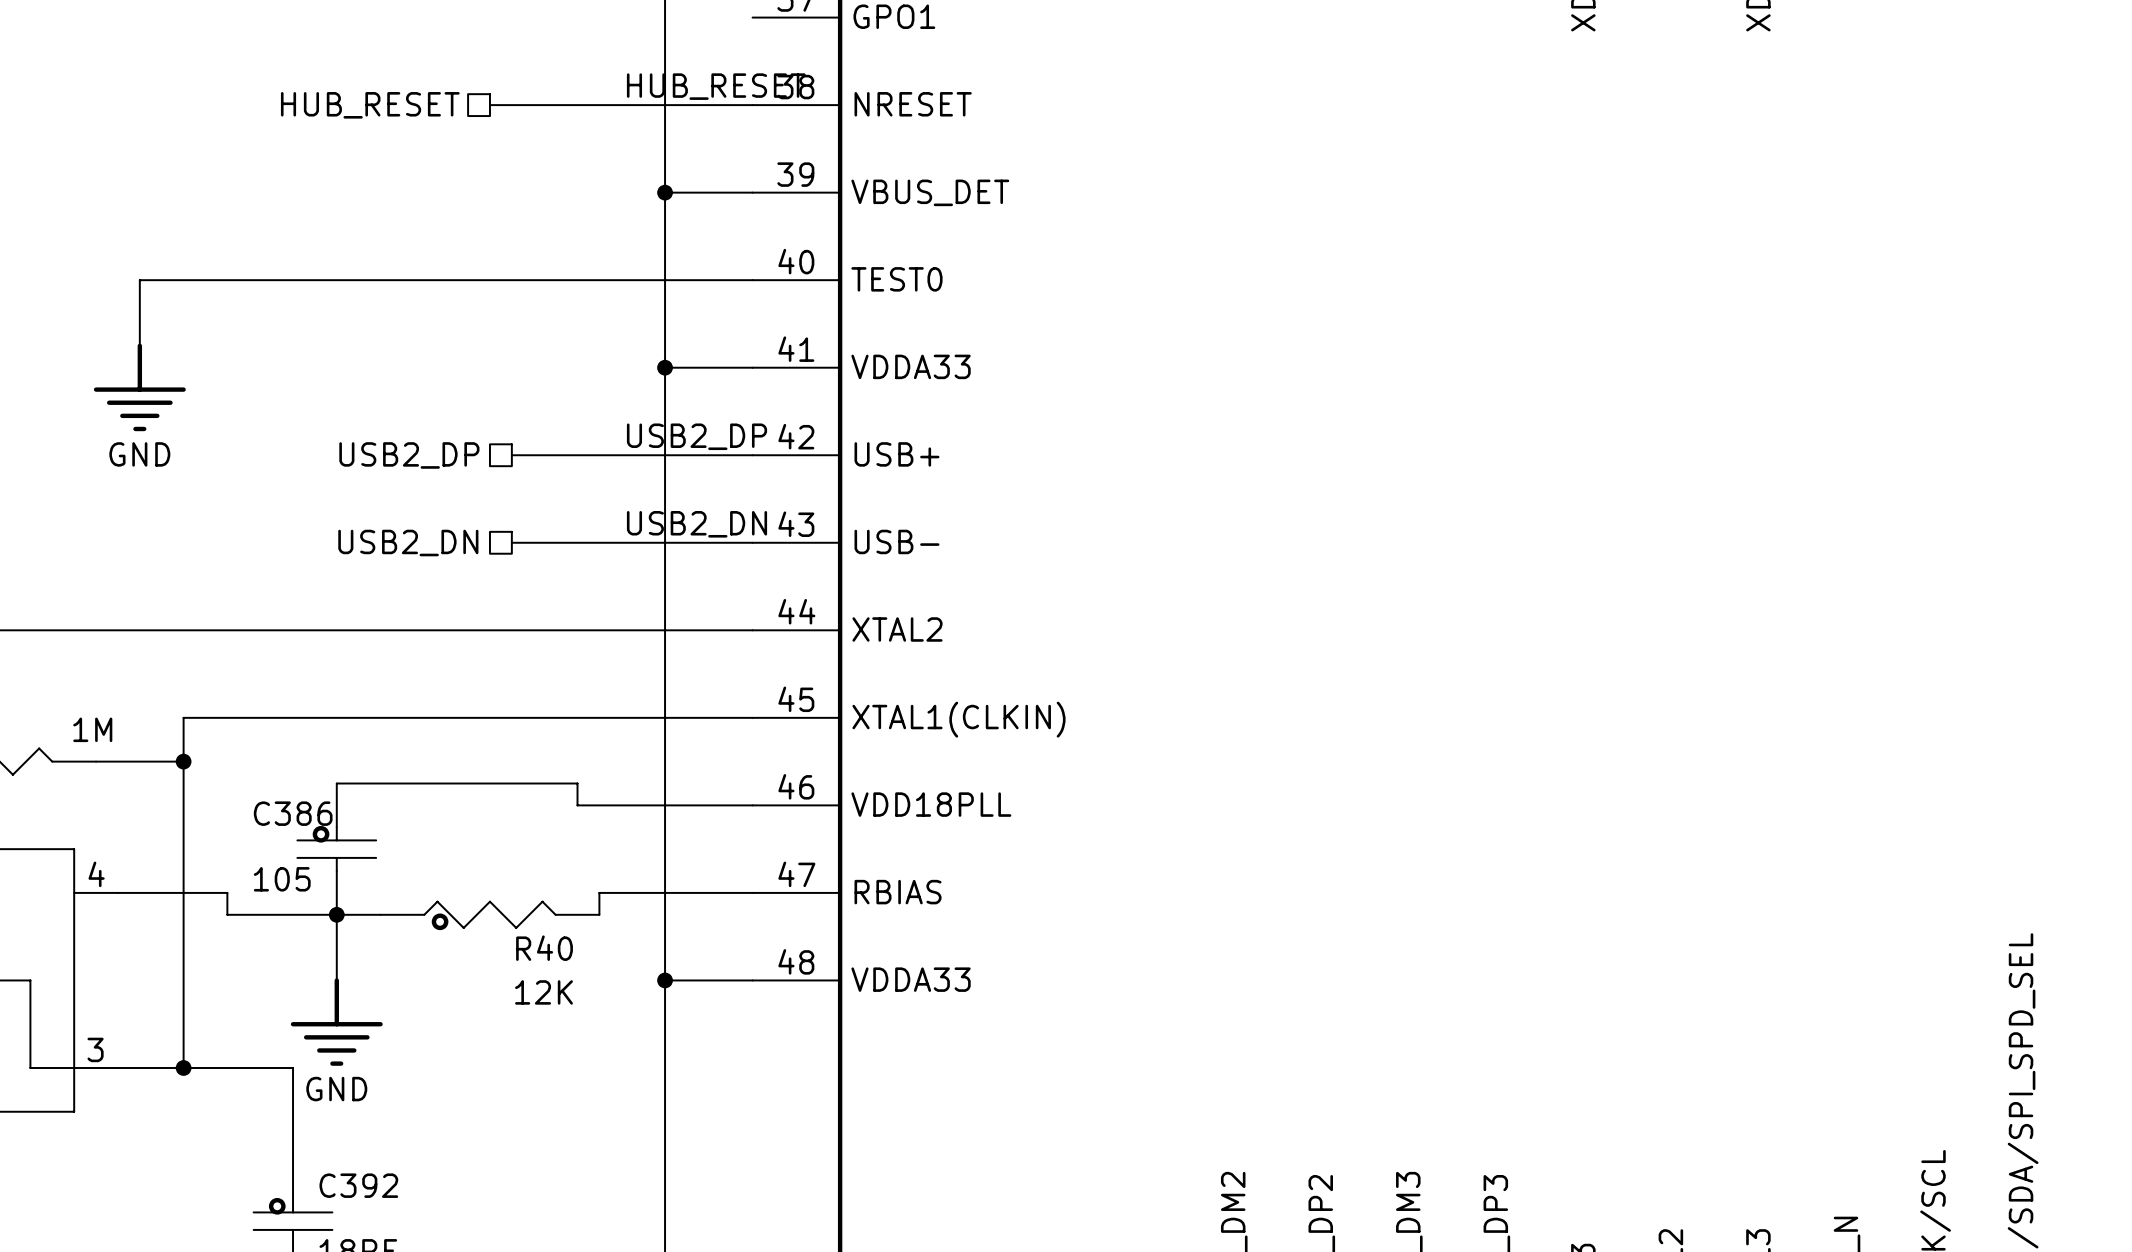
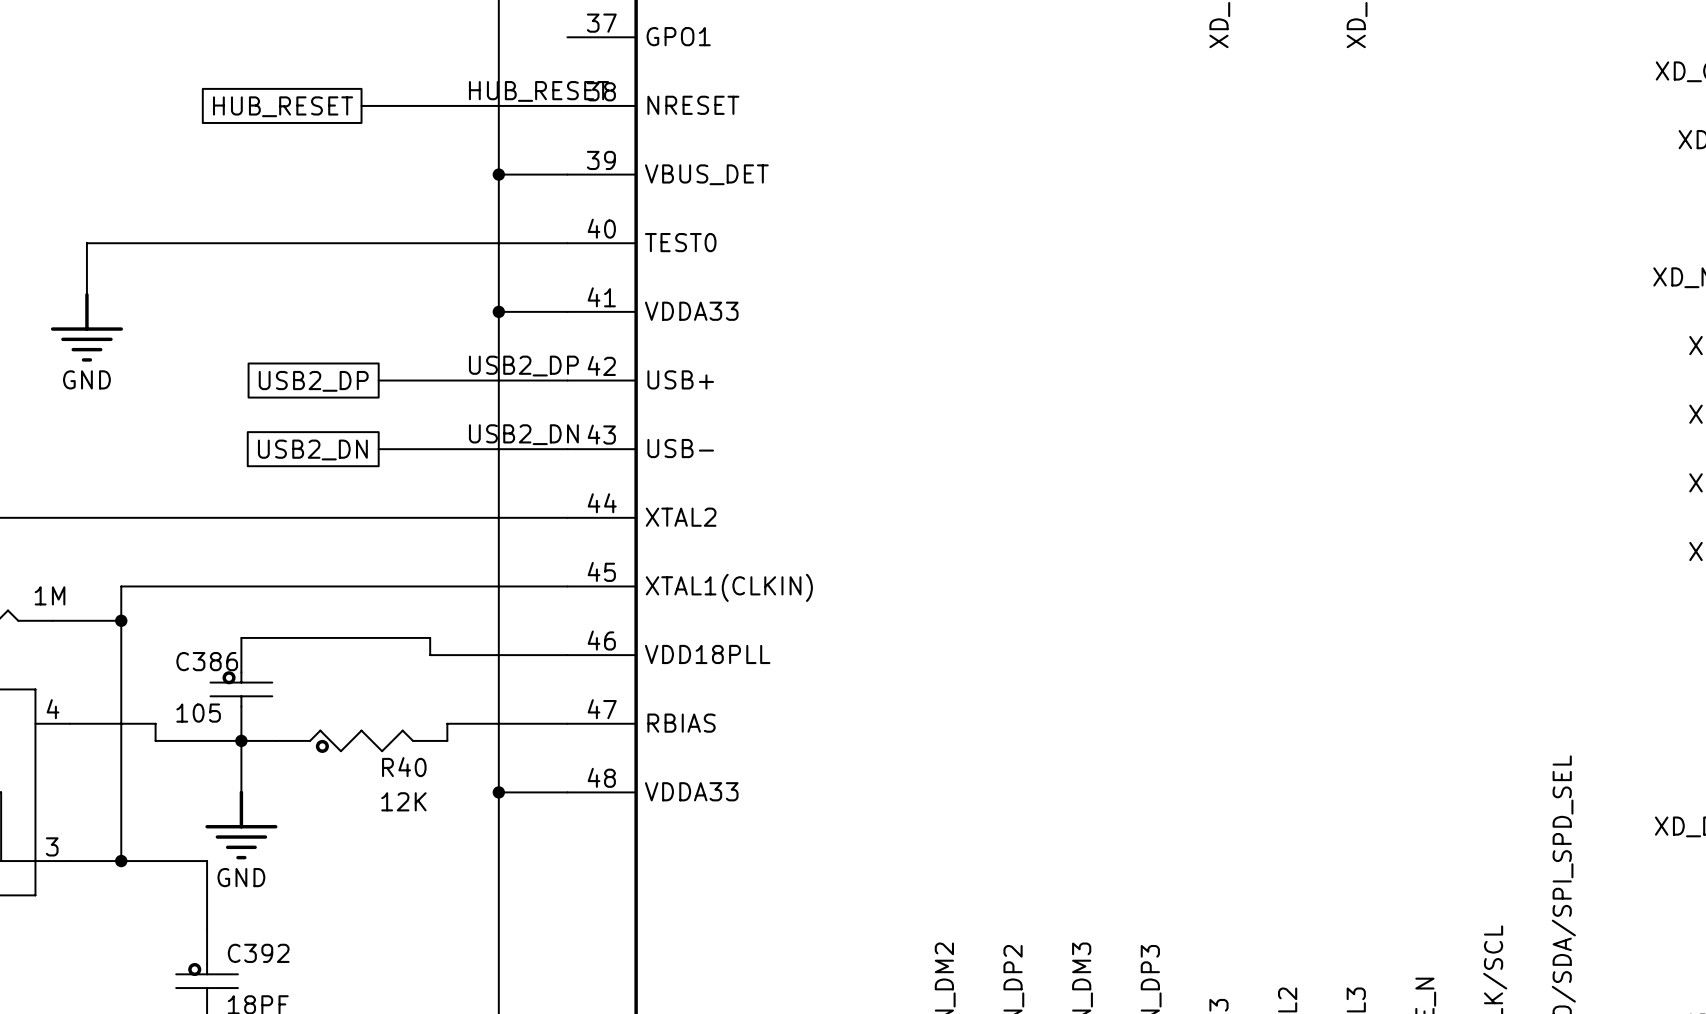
hierarchical label: HUB_RESET (370, 105) -> none
global label: none -> HUB_RESET (283, 106)
hierarchical label: USB2_DP (409, 455) -> none
global label: none -> USB2_DP (313, 381)
hierarchical label: USB2_DN (408, 543) -> none
global label: none -> USB2_DN (312, 449)

